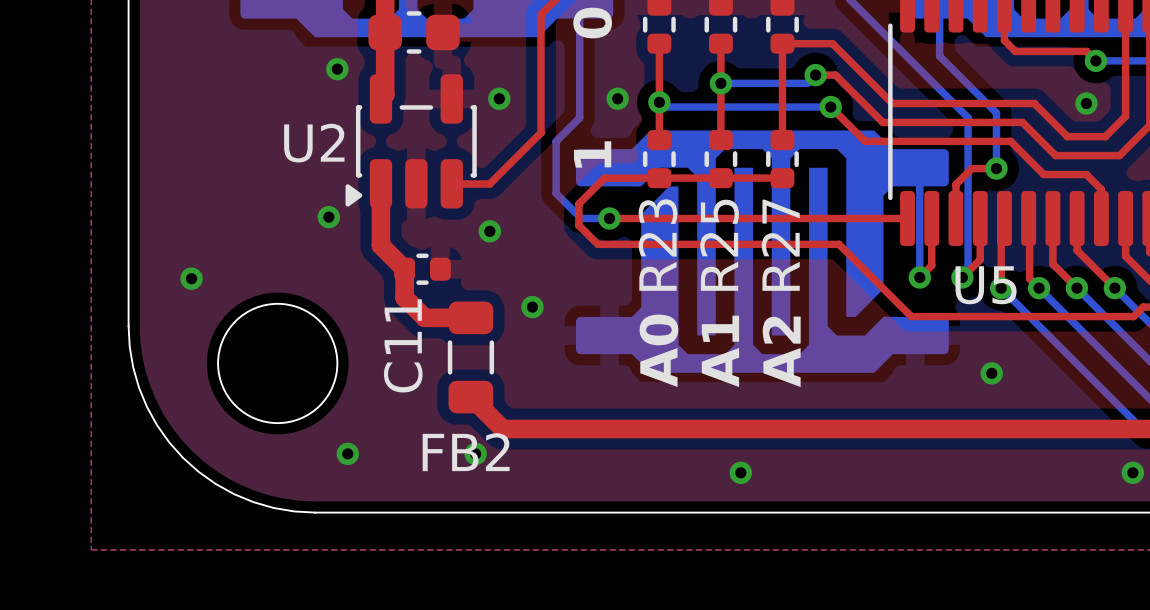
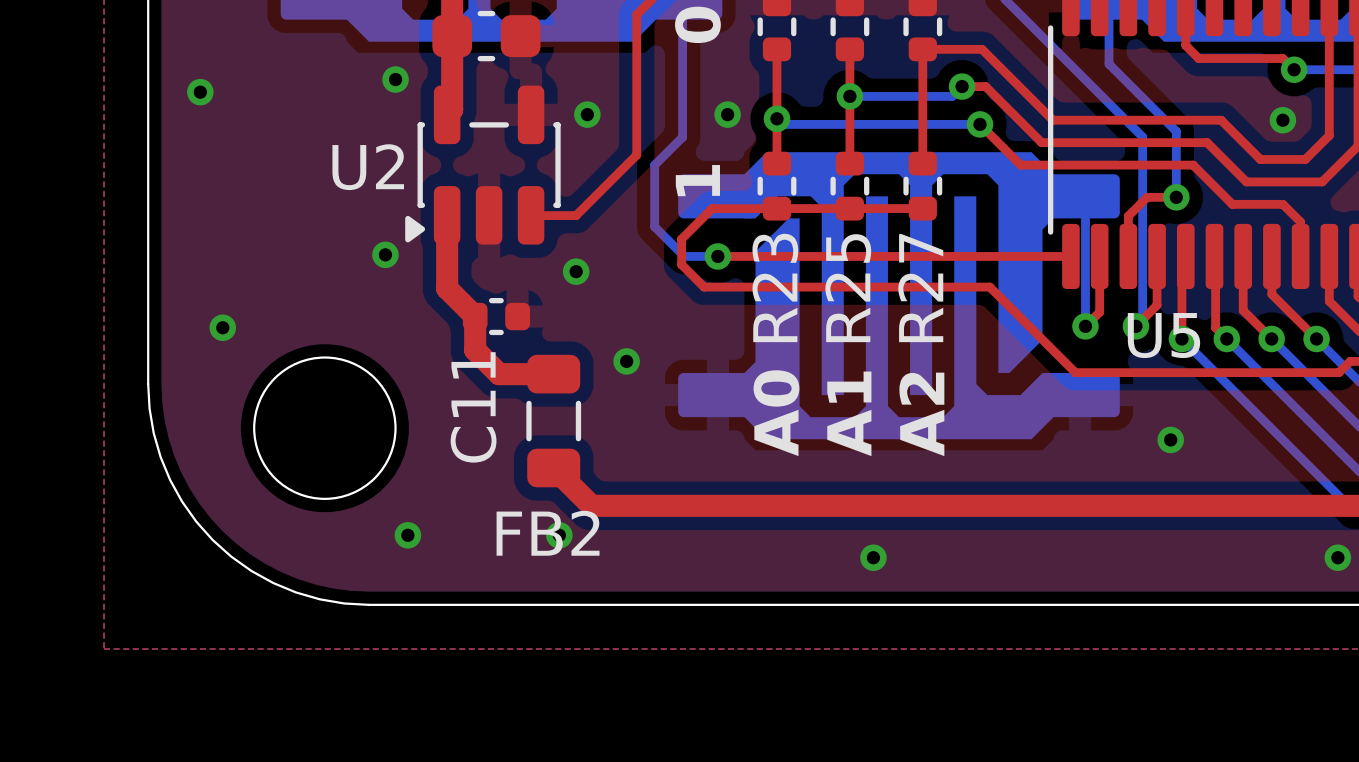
via: none -> (200, 92)

